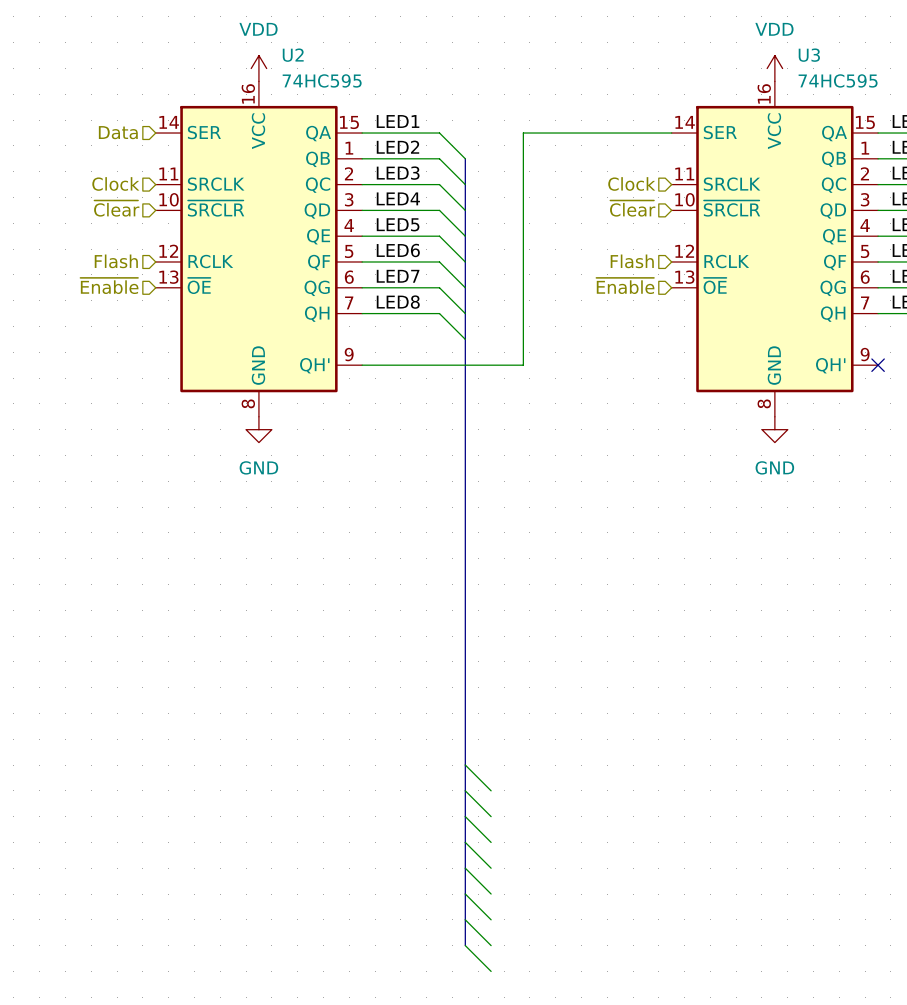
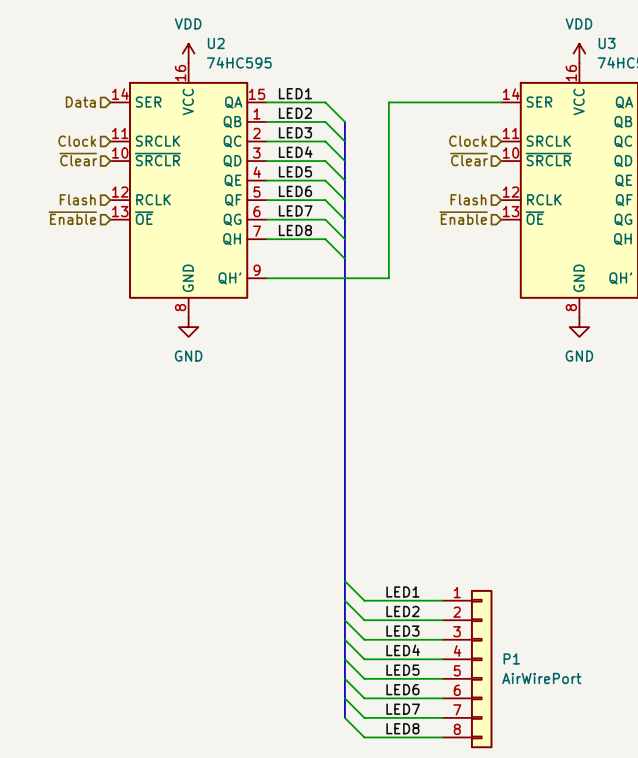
label: none -> LED1 (402, 591)
wire: none -> (364, 600) (442, 600)
label: none -> LED2 (402, 611)
wire: none -> (364, 620) (442, 620)
label: none -> LED3 (402, 631)
wire: none -> (364, 639) (442, 639)
label: none -> LED4 (403, 650)
wire: none -> (364, 659) (442, 659)
P1: none -> AirWirePort (467, 669)
label: none -> LED5 (402, 670)
wire: none -> (364, 678) (442, 678)
label: none -> LED6 (402, 689)
wire: none -> (364, 698) (442, 698)
label: none -> LED7 (403, 709)
wire: none -> (364, 717) (442, 717)
label: none -> LED8 (402, 728)
wire: none -> (364, 737) (442, 737)

